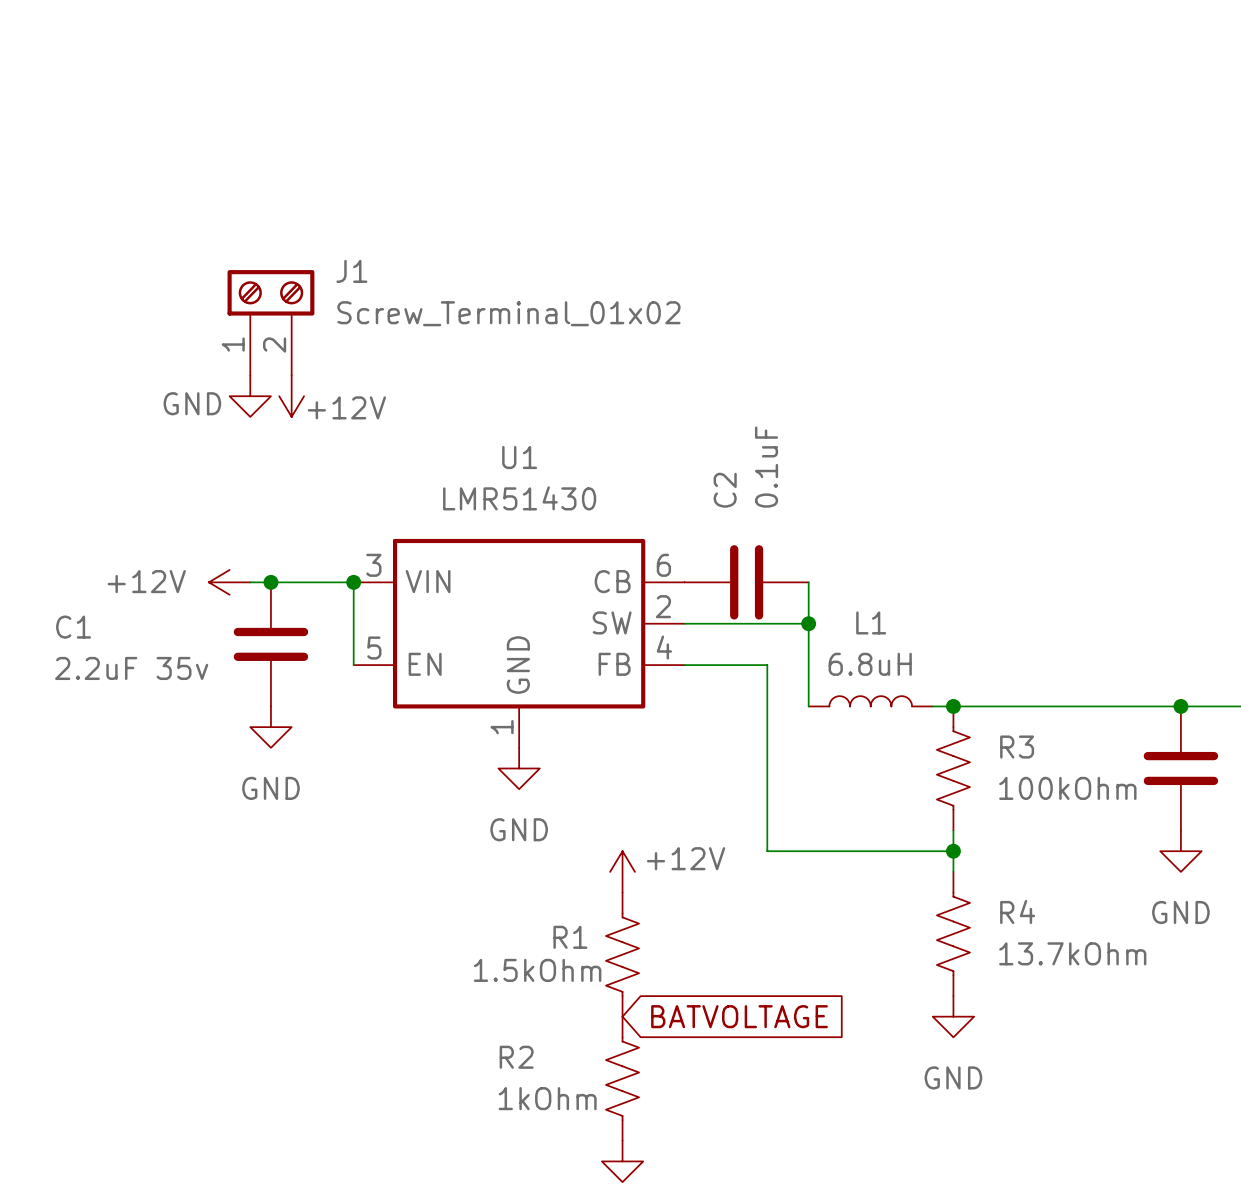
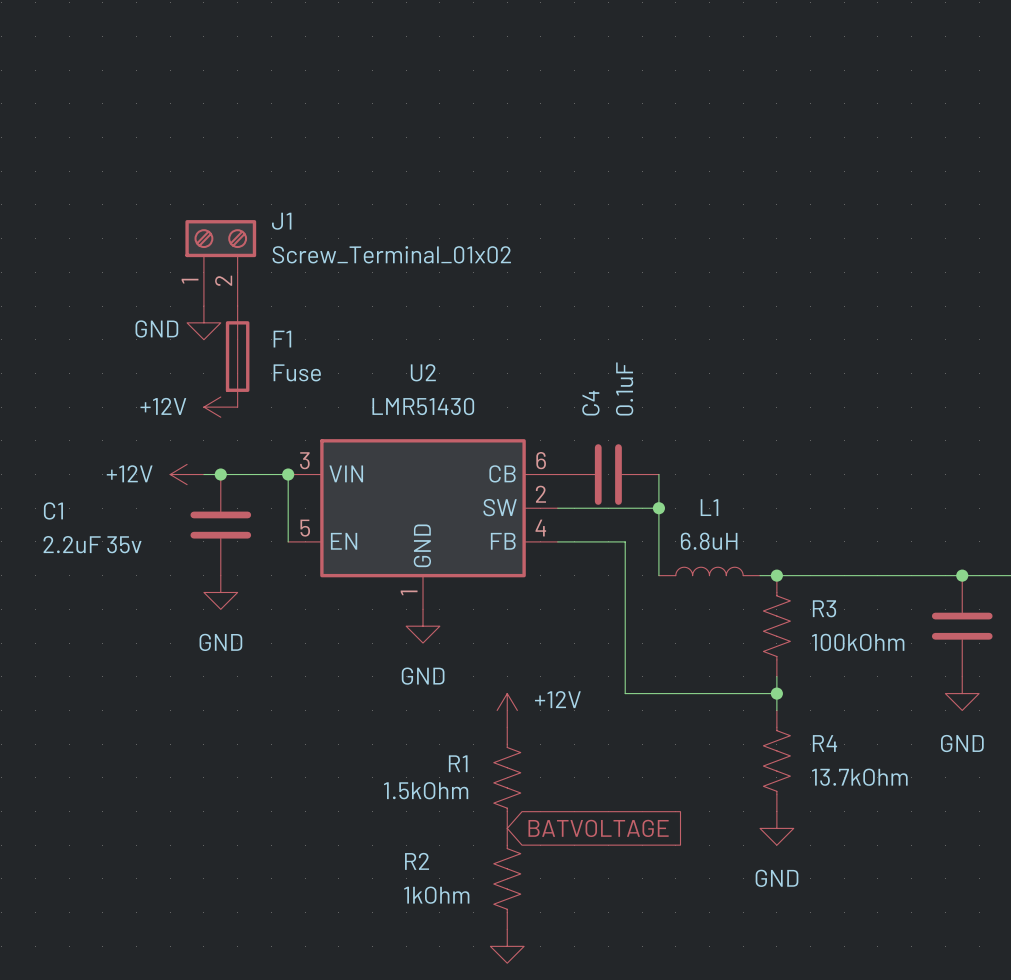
power symbol rotation: 0° (291, 396) -> 90° clockwise (220, 407)
power symbol position: +12V (291, 396) -> +12V (220, 407)
power symbol text position: +12V (346, 407) -> +12V (163, 406)
F1: none -> Fuse (237, 356)
U1 name: U1 (519, 457) -> U2 (423, 372)
C2 name: C2 (725, 490) -> C4 (590, 403)

